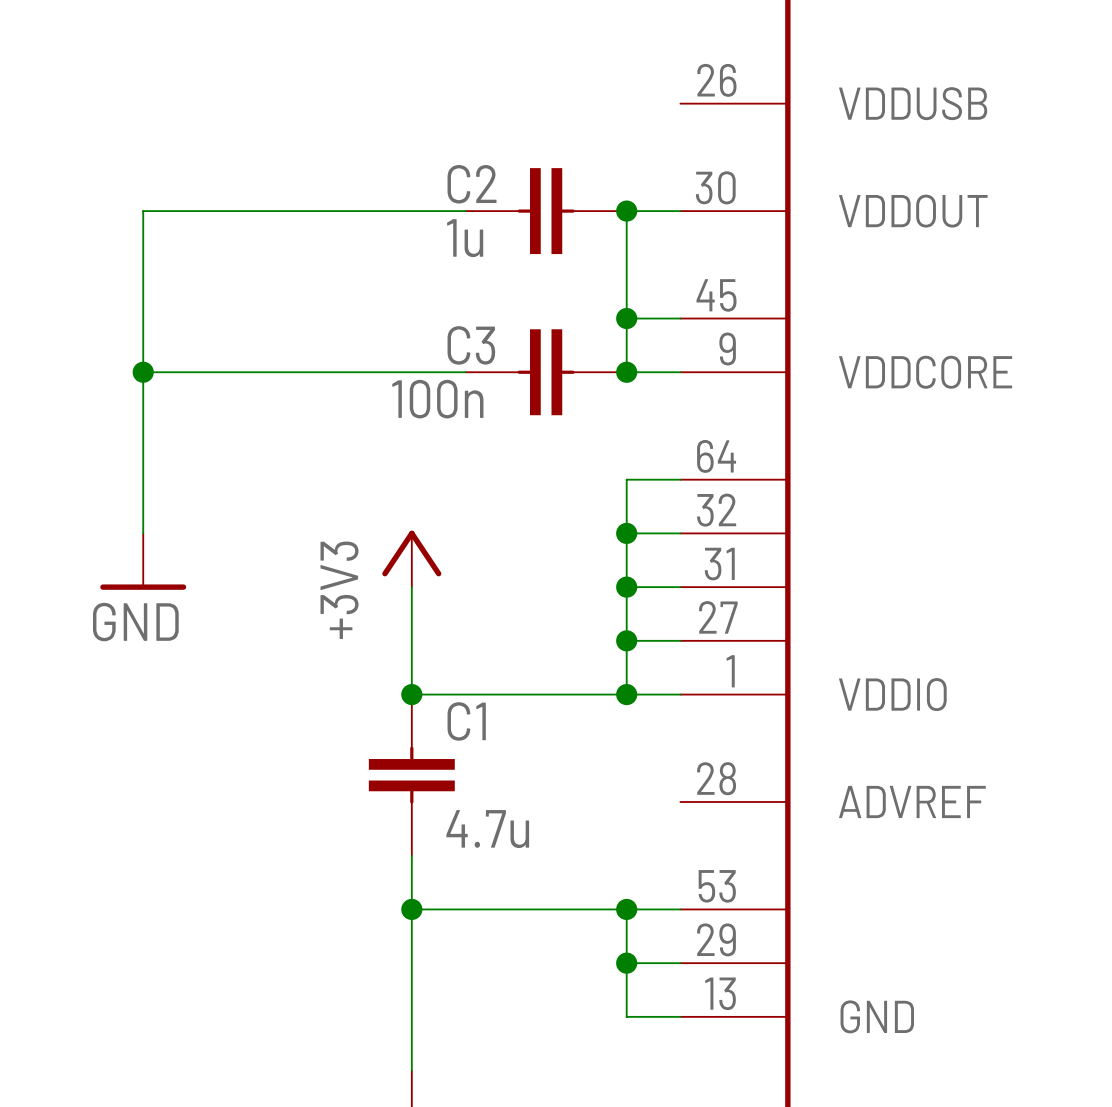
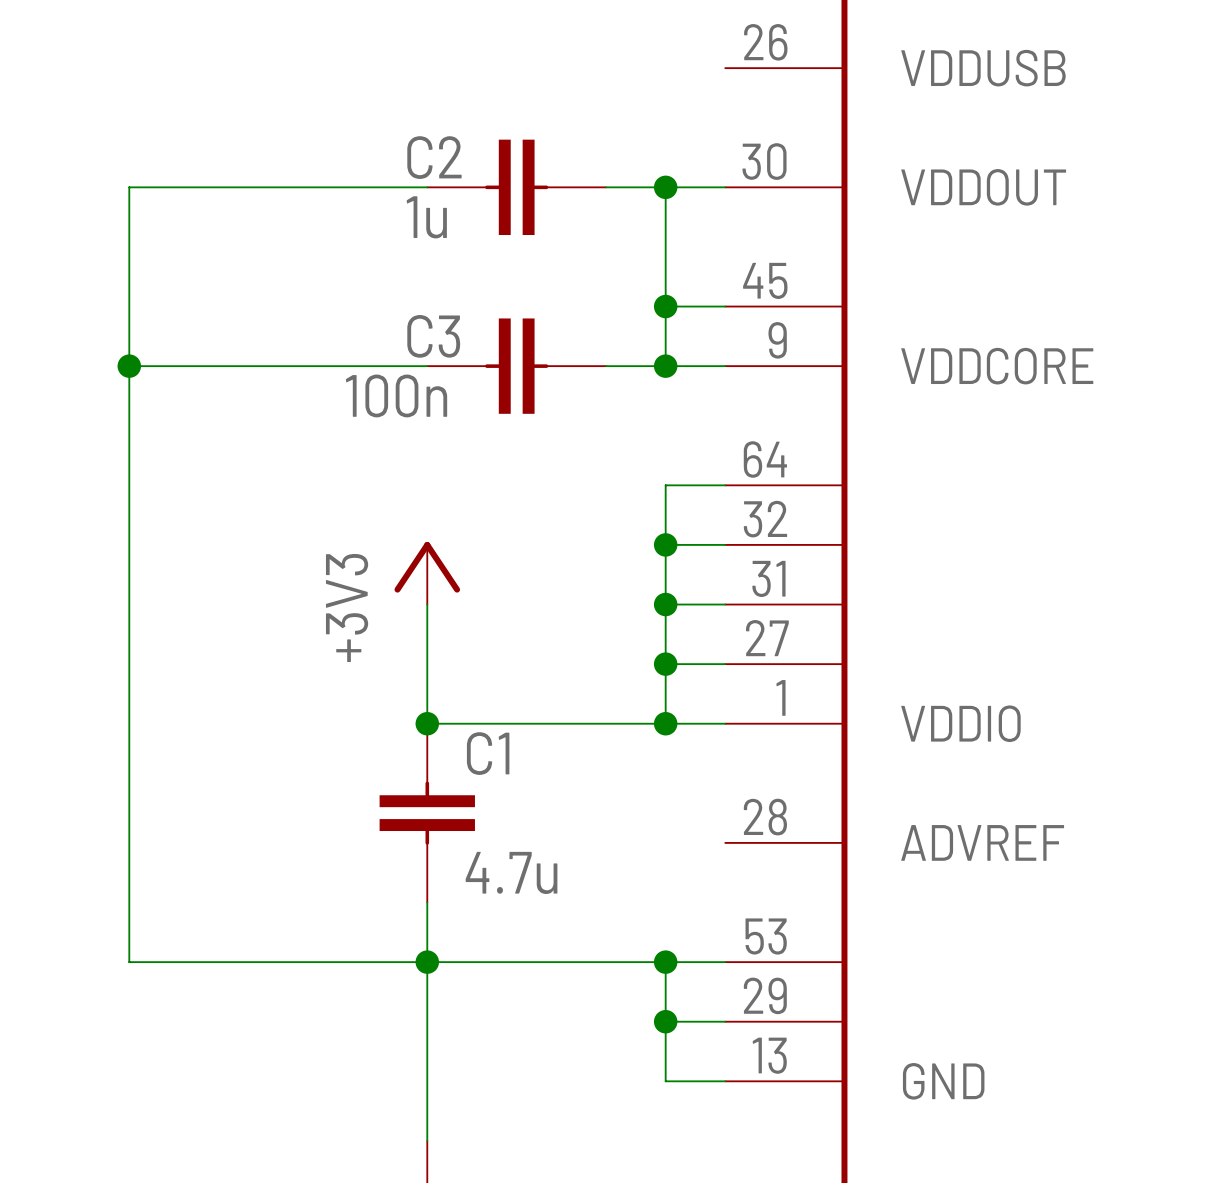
C2 position: (546, 211) -> (516, 187)
C3 position: (546, 372) -> (516, 366)
wire: none -> (129, 544) (129, 962) (427, 962)
power symbol: GND (143, 561) -> none

